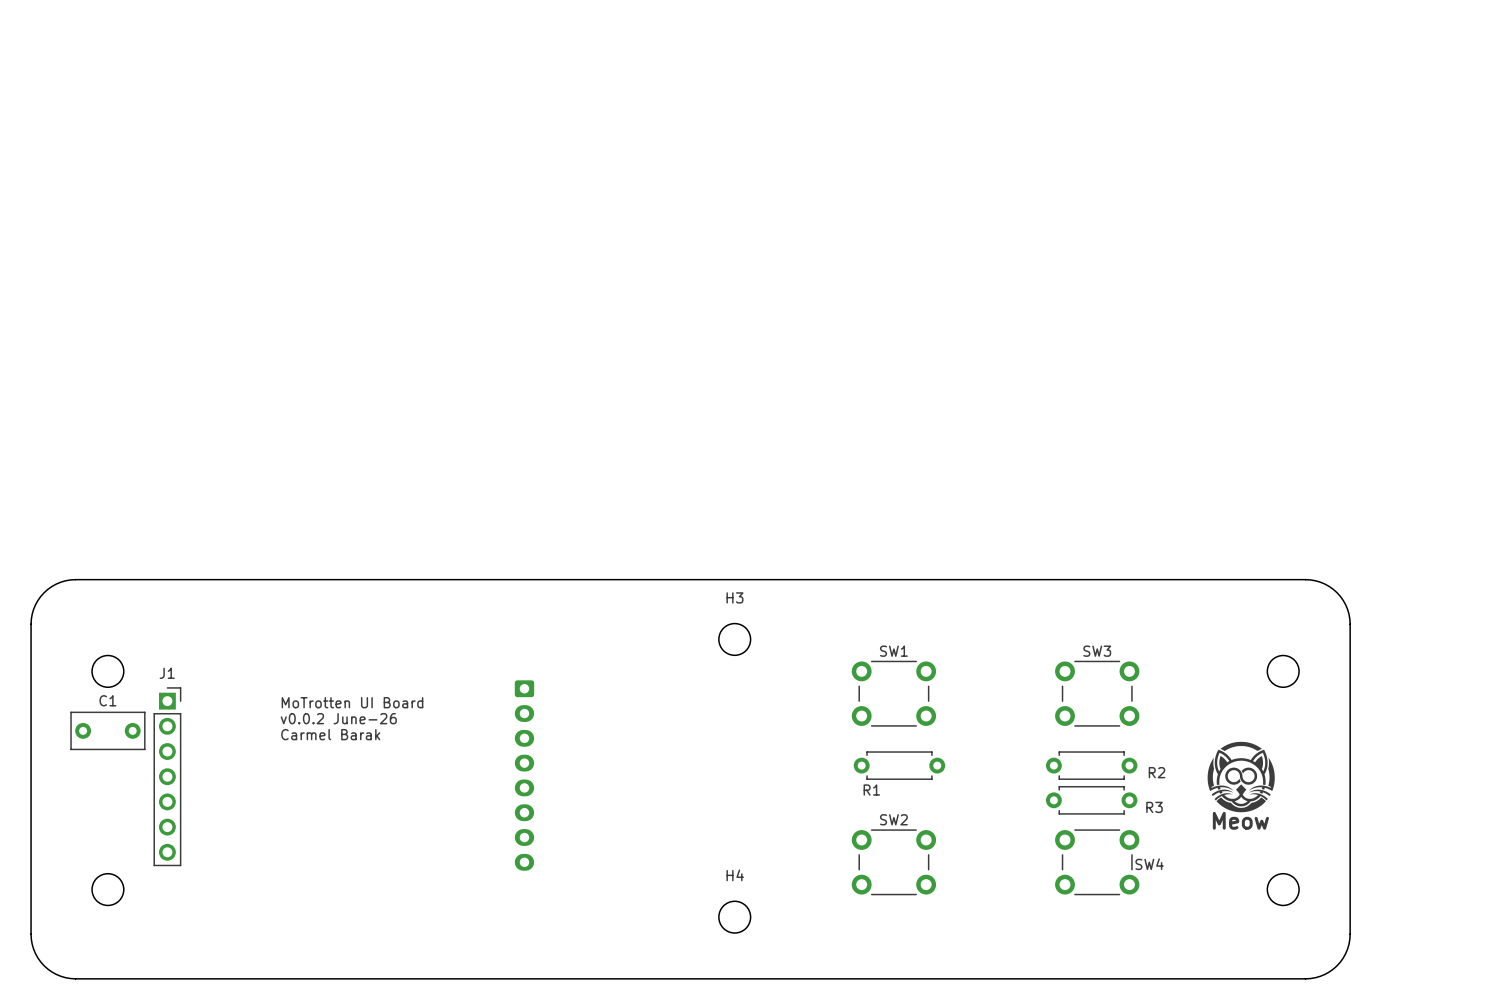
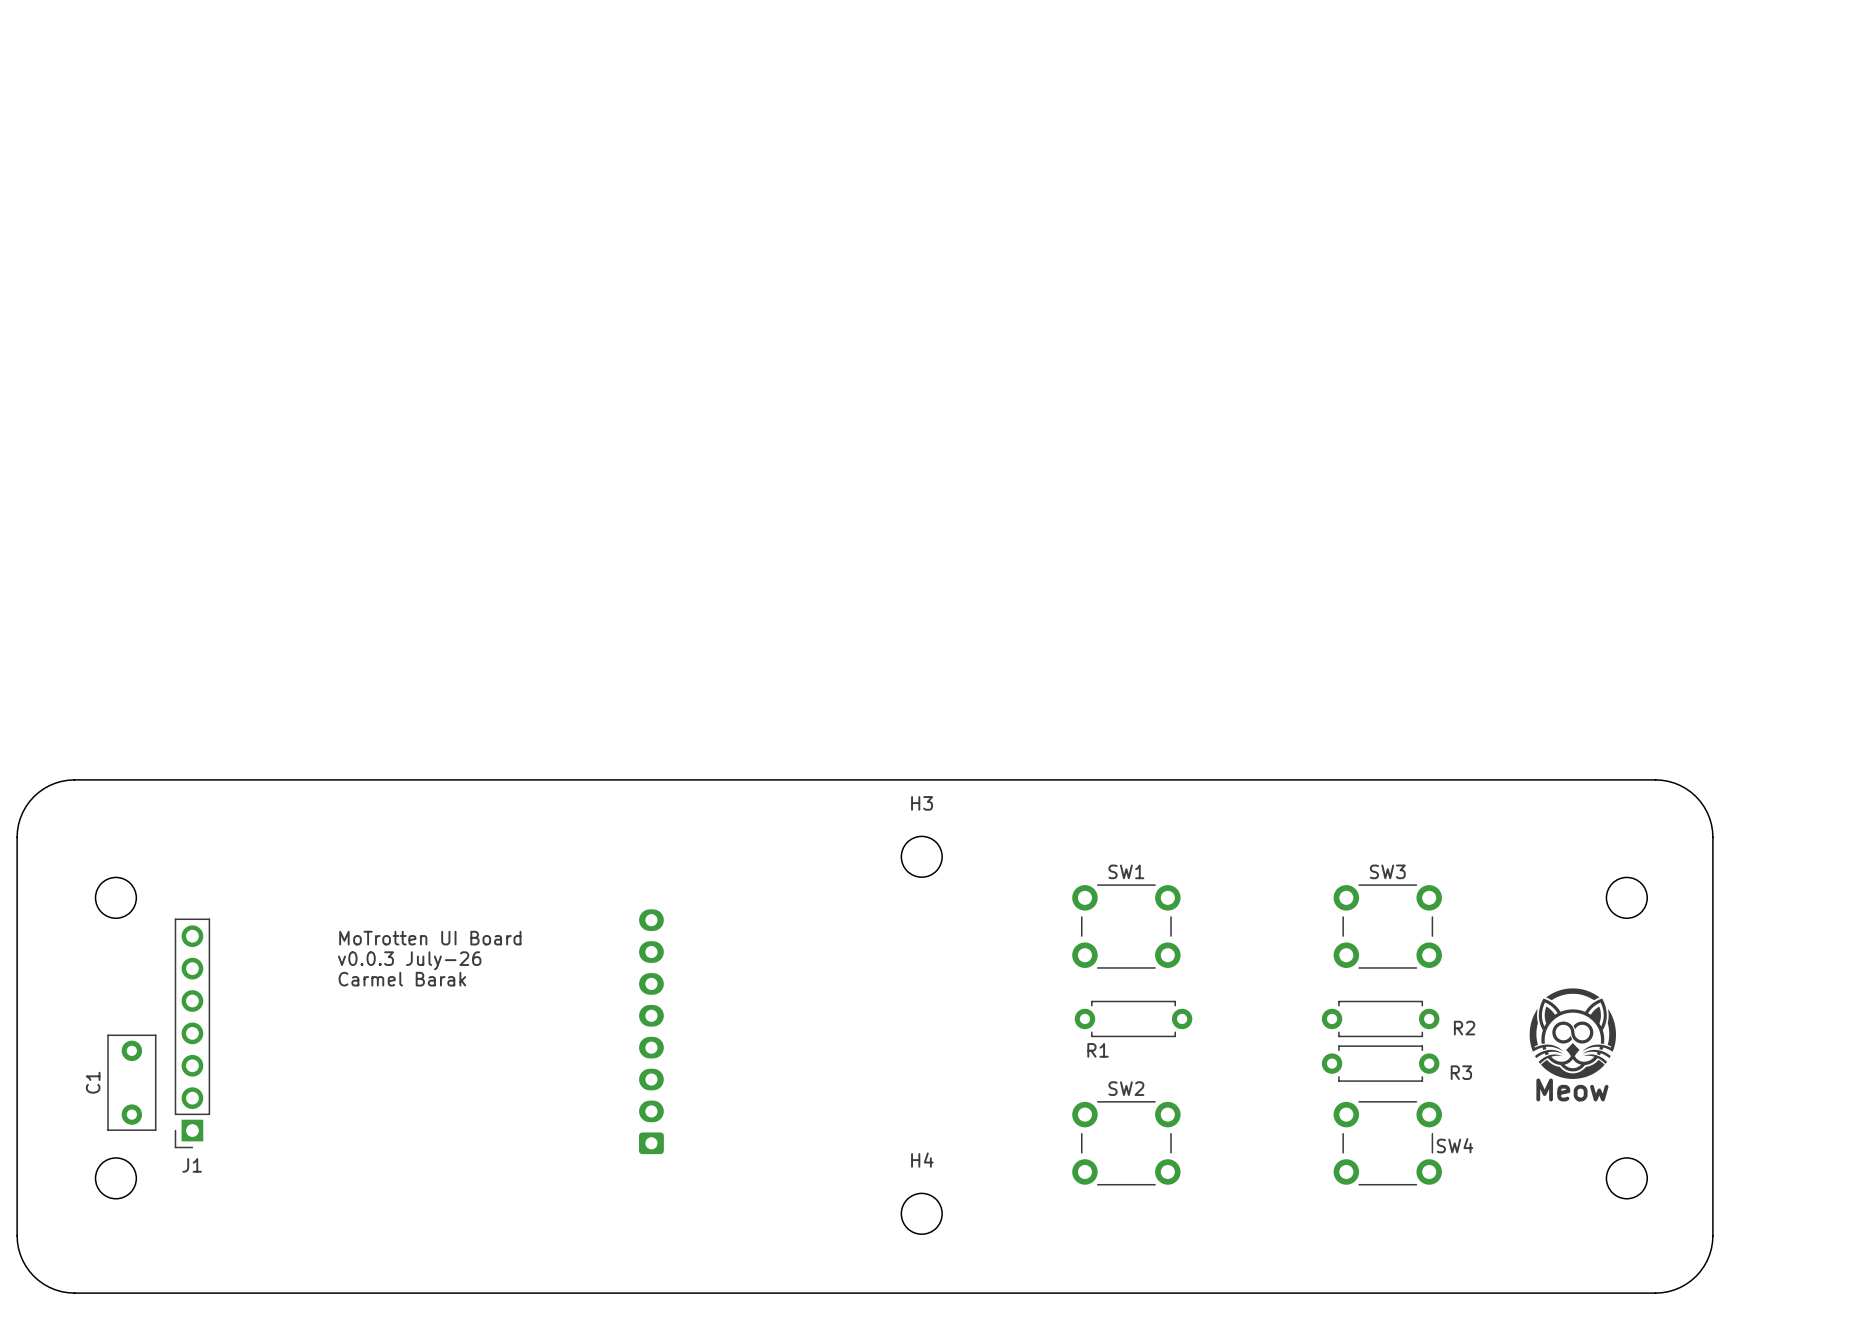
C1 name position: C1 (107, 700) -> C1 (93, 1082)
text: v0.0.2 June-26 (338, 718) -> v0.0.3 July-26 (409, 960)
C1 rotation: 0° (107, 730) -> 90° clockwise (131, 1082)
C1 position: (107, 730) -> (131, 1082)
part rotation: 0° (524, 775) -> 180° (651, 1031)
J1 rotation: 0° (167, 776) -> 180° (192, 1033)

